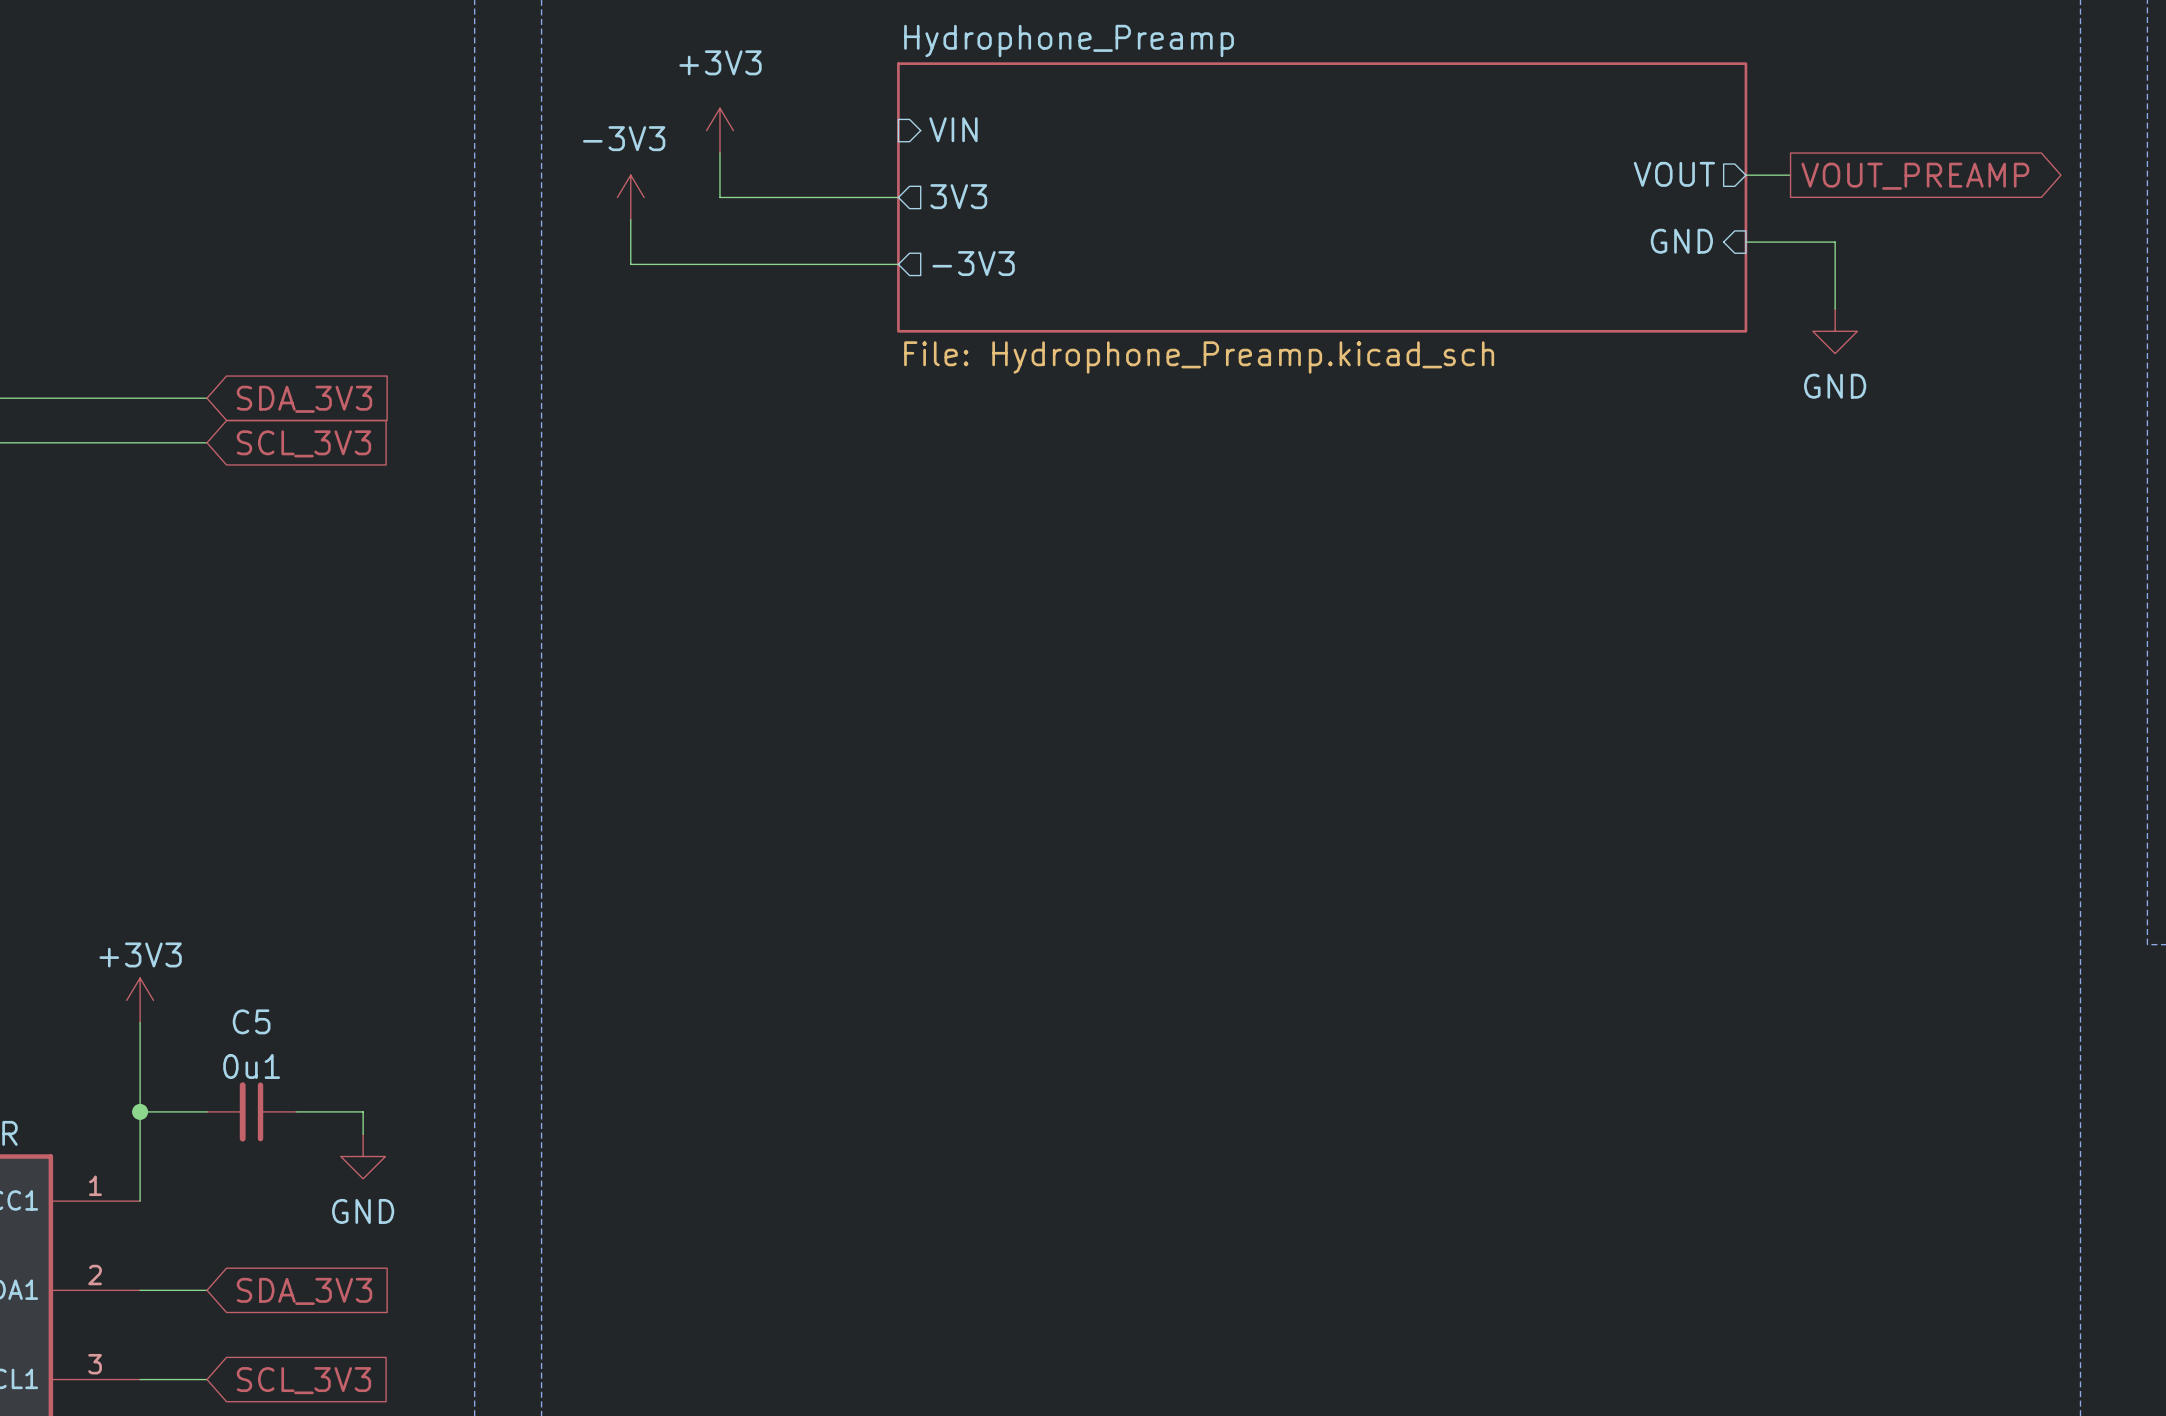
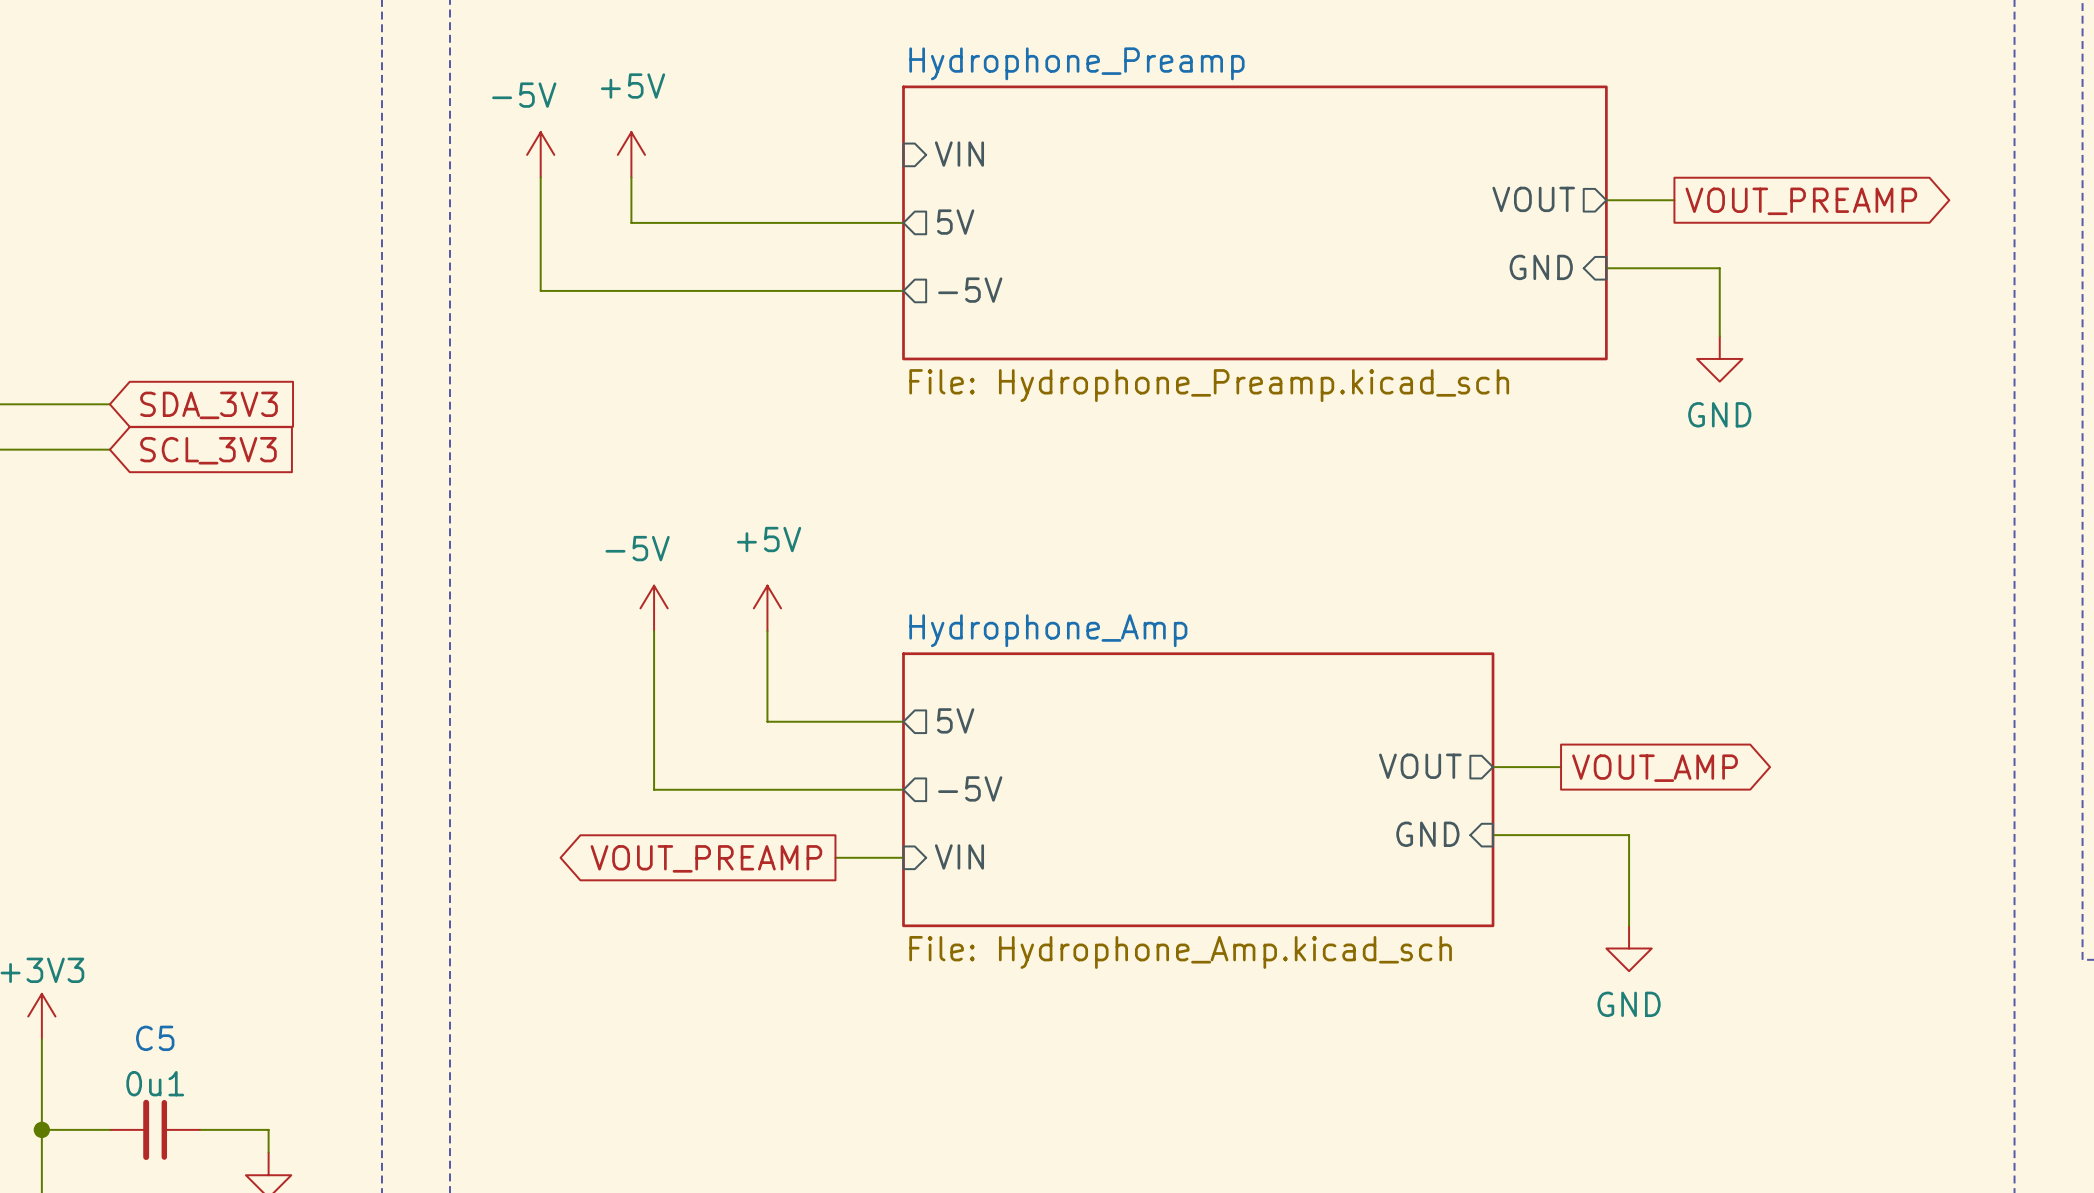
sheet pin position: VIN (953, 129) -> VIN (959, 154)
power symbol: +3V3 (719, 130) -> none
power symbol: none -> -5V (540, 154)
power symbol: none -> +5V (631, 154)
sheet pin position: VOUT (1674, 174) -> VOUT (1533, 199)
global label position: VOUT_PREAMP (1915, 176) -> VOUT_PREAMP (1801, 201)
sheet pin: 3V3 (958, 196) -> none
power symbol: -3V3 (630, 197) -> none
wire: (719, 197) (898, 197) -> (631, 200) (631, 222) (903, 222)
sheet Hydrophone_Preamp: File: Hydrophone_Preamp.kicad_sch (1322, 197) -> none
wire: none -> (1606, 200) (1674, 200)
sheet pin: none -> 5V (955, 222)
sheet Hydrophone_Preamp: none -> File: Hydrophone_Preamp.kicad_sch (1254, 222)
sheet pin position: GND (1681, 241) -> GND (1541, 267)
wire: (1745, 242) (1835, 242) (1835, 308) -> none
sheet pin: -3V3 (973, 263) -> none
wire: (630, 264) (898, 264) -> (540, 268) (540, 290) (903, 290)
wire: none -> (1606, 268) (1719, 268) (1719, 336)
sheet pin: none -> -5V (970, 290)
power symbol position: GND (1835, 331) -> GND (1719, 358)
power symbol: none -> -5V (654, 608)
power symbol: none -> +5V (767, 608)
wire: none -> (654, 631) (654, 789) (903, 789)
wire: none -> (767, 631) (767, 721) (903, 721)
sheet pin: none -> 5V (955, 720)
sheet pin: none -> VOUT (1420, 766)
wire: none -> (1493, 767) (1561, 767)
global label: none -> VOUT_AMP (1655, 768)
sheet pin: none -> -5V (970, 788)
sheet Hydrophone_Amp: none -> File: Hydrophone_Amp.kicad_sch (1198, 789)
sheet pin: none -> GND (1427, 834)
wire: none -> (1493, 835) (1629, 835) (1629, 925)
sheet pin: none -> VIN (959, 856)
wire: none -> (835, 857) (903, 857)
global label: none -> VOUT_PREAMP (706, 858)
power symbol: none -> GND (1629, 948)

